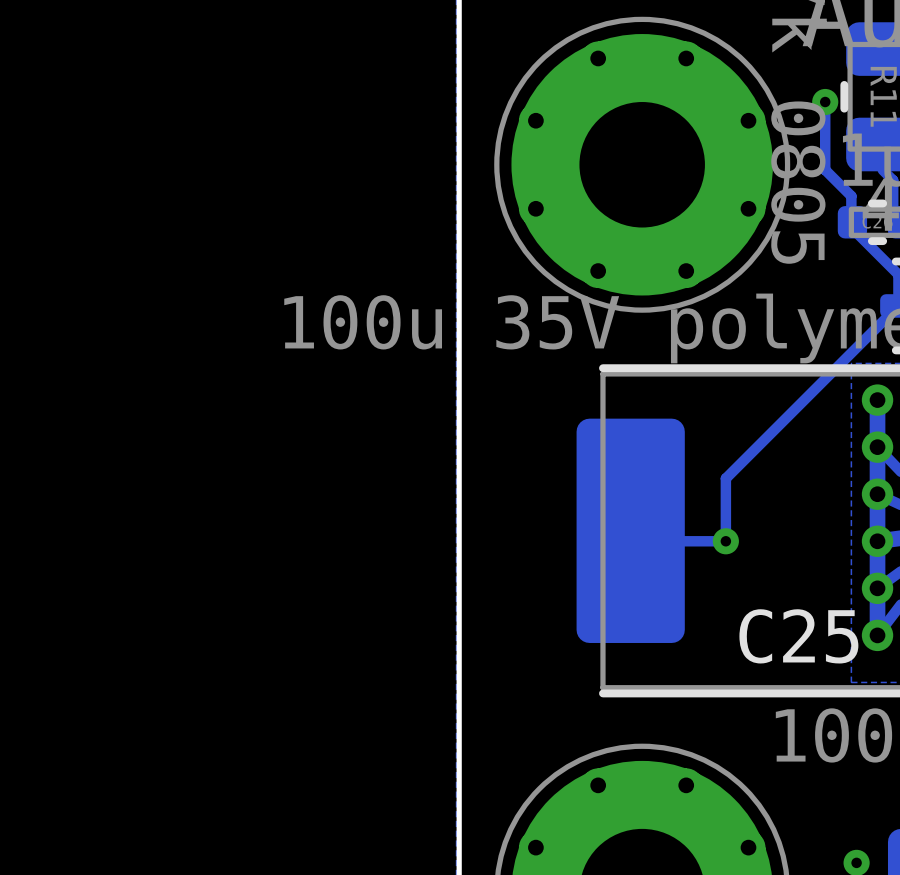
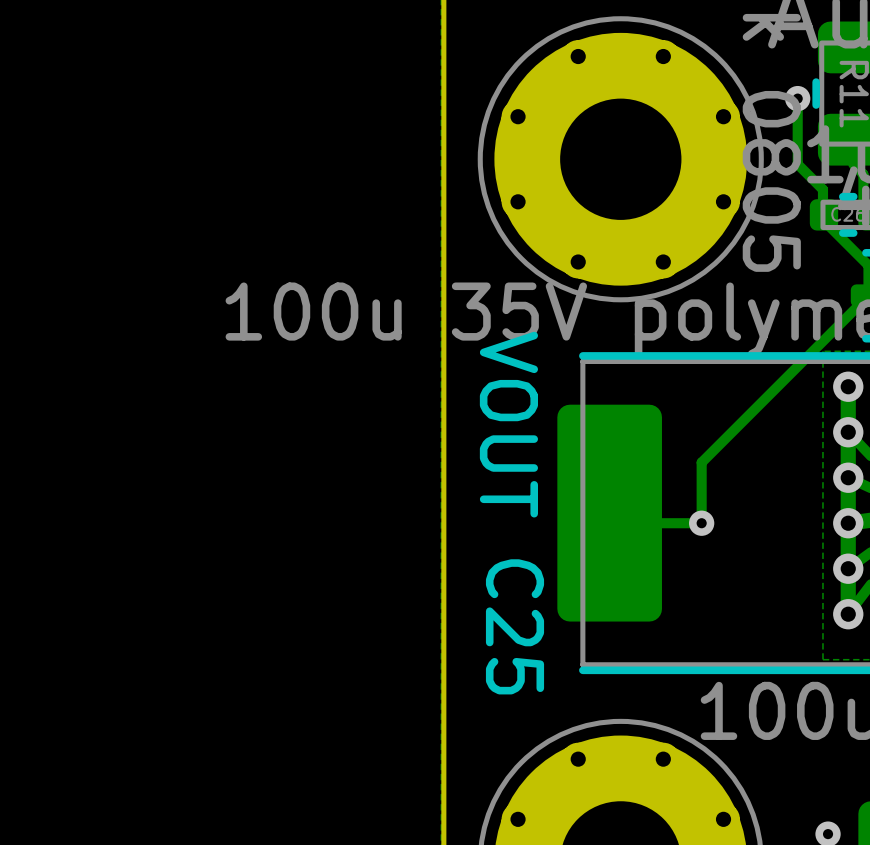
text: none -> VOUT (508, 424)
C25 name rotation: 0° (798, 636) -> 90° clockwise (515, 626)
C25 name position: C25 (798, 636) -> C25 (515, 626)

